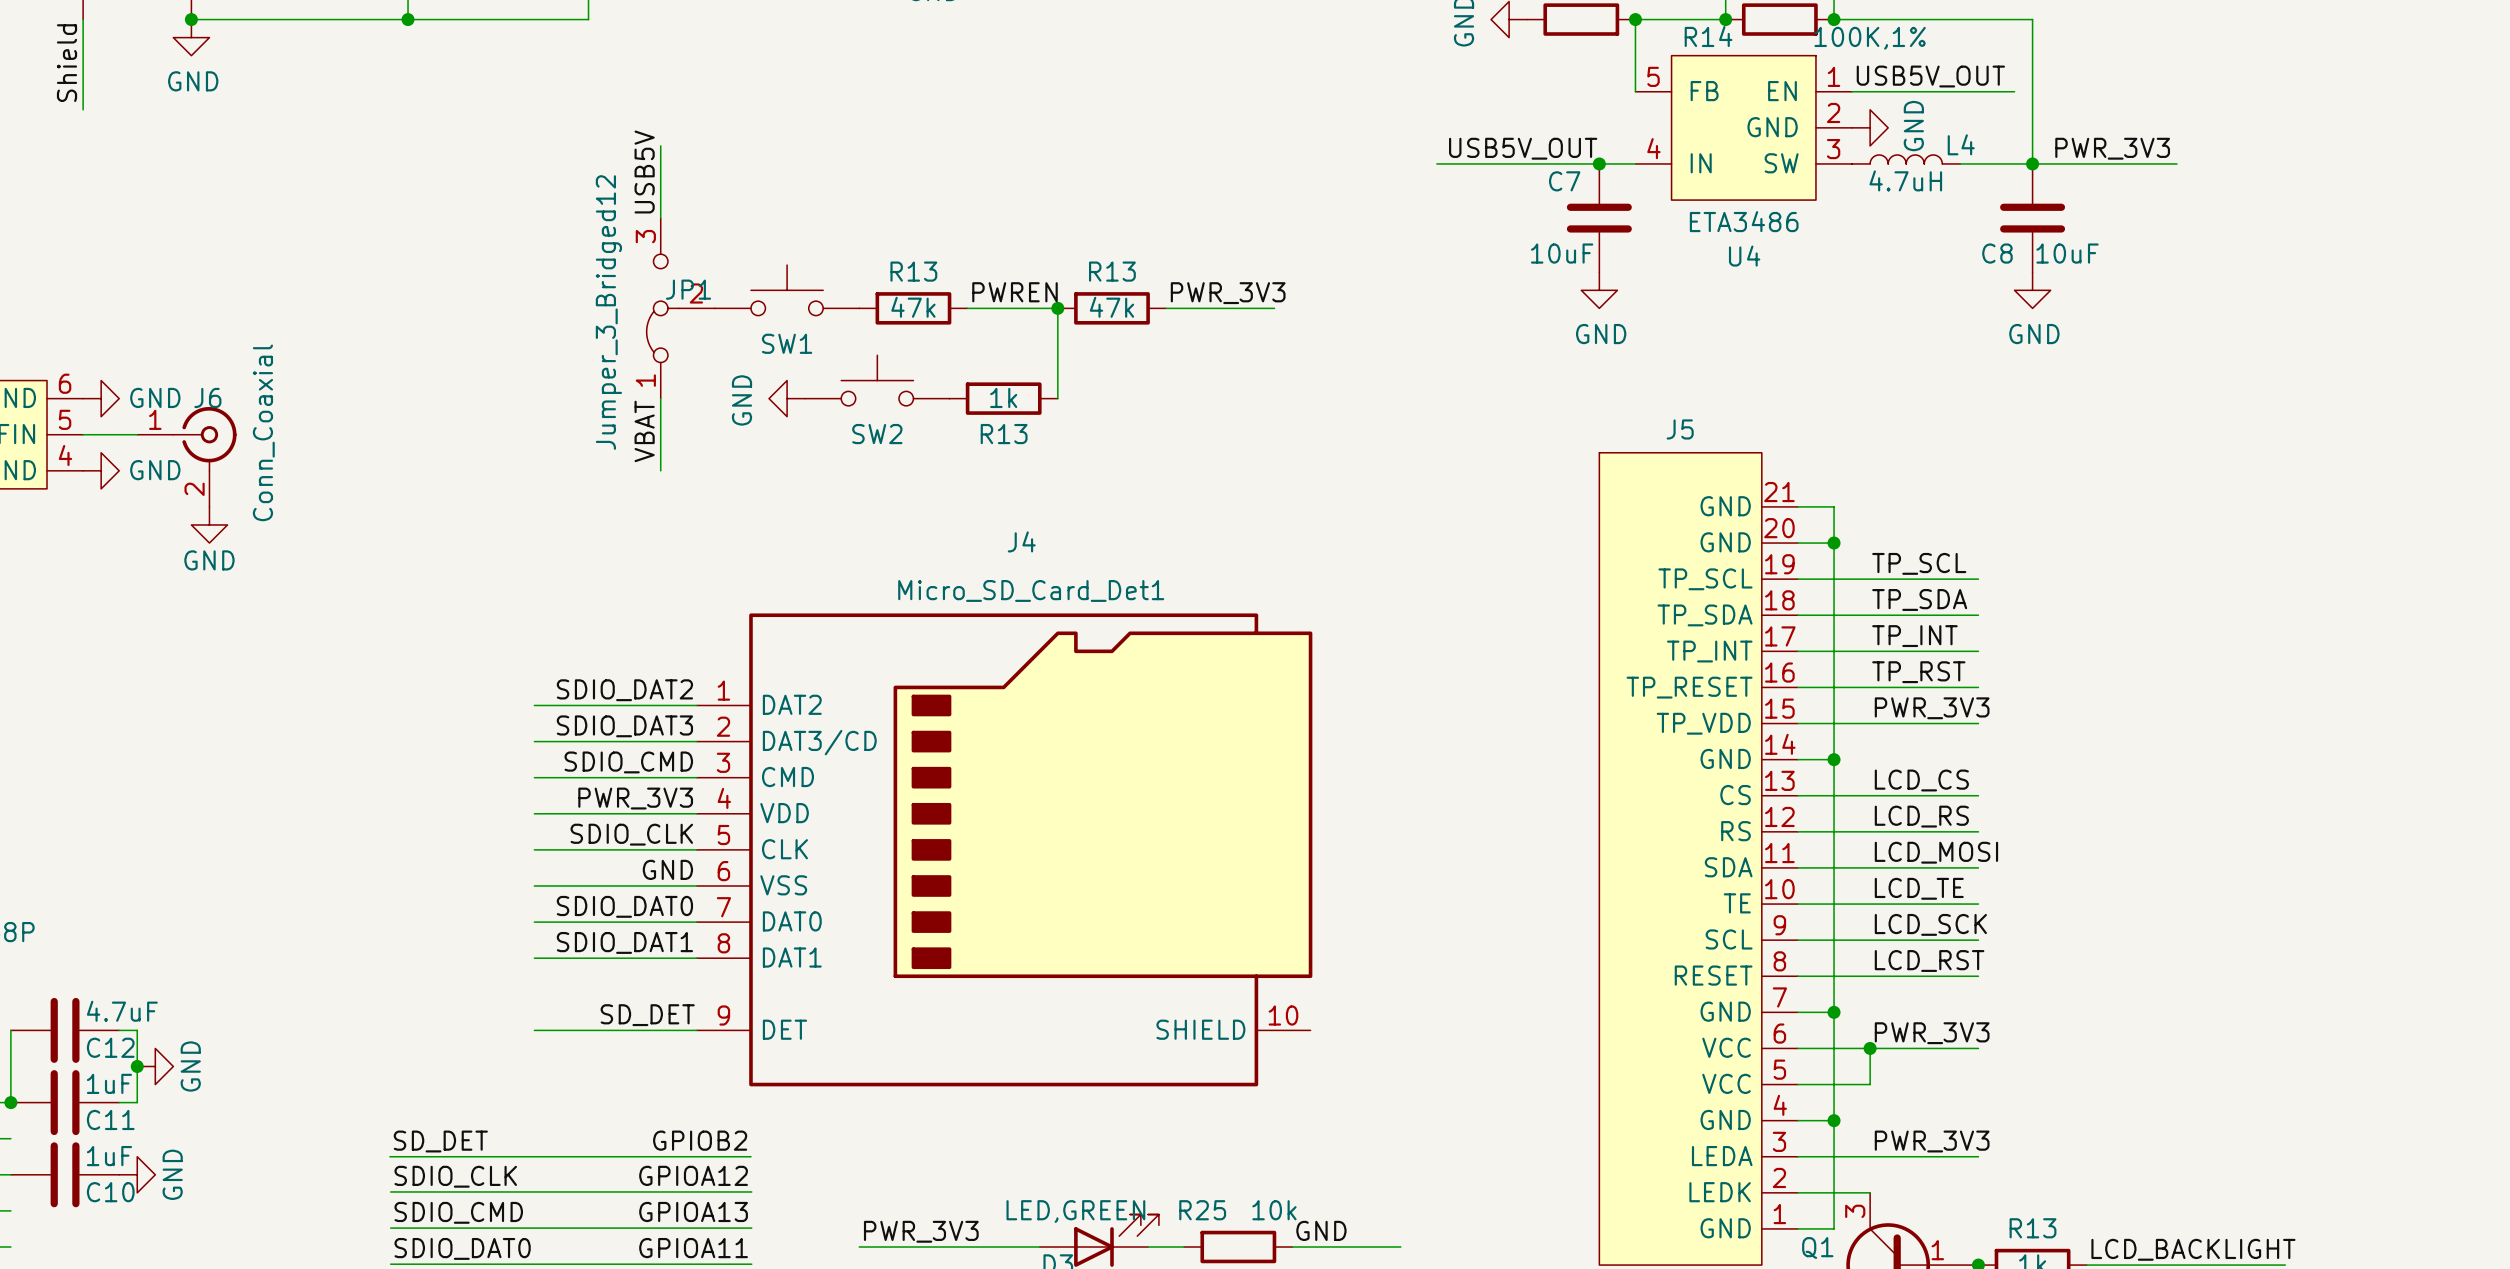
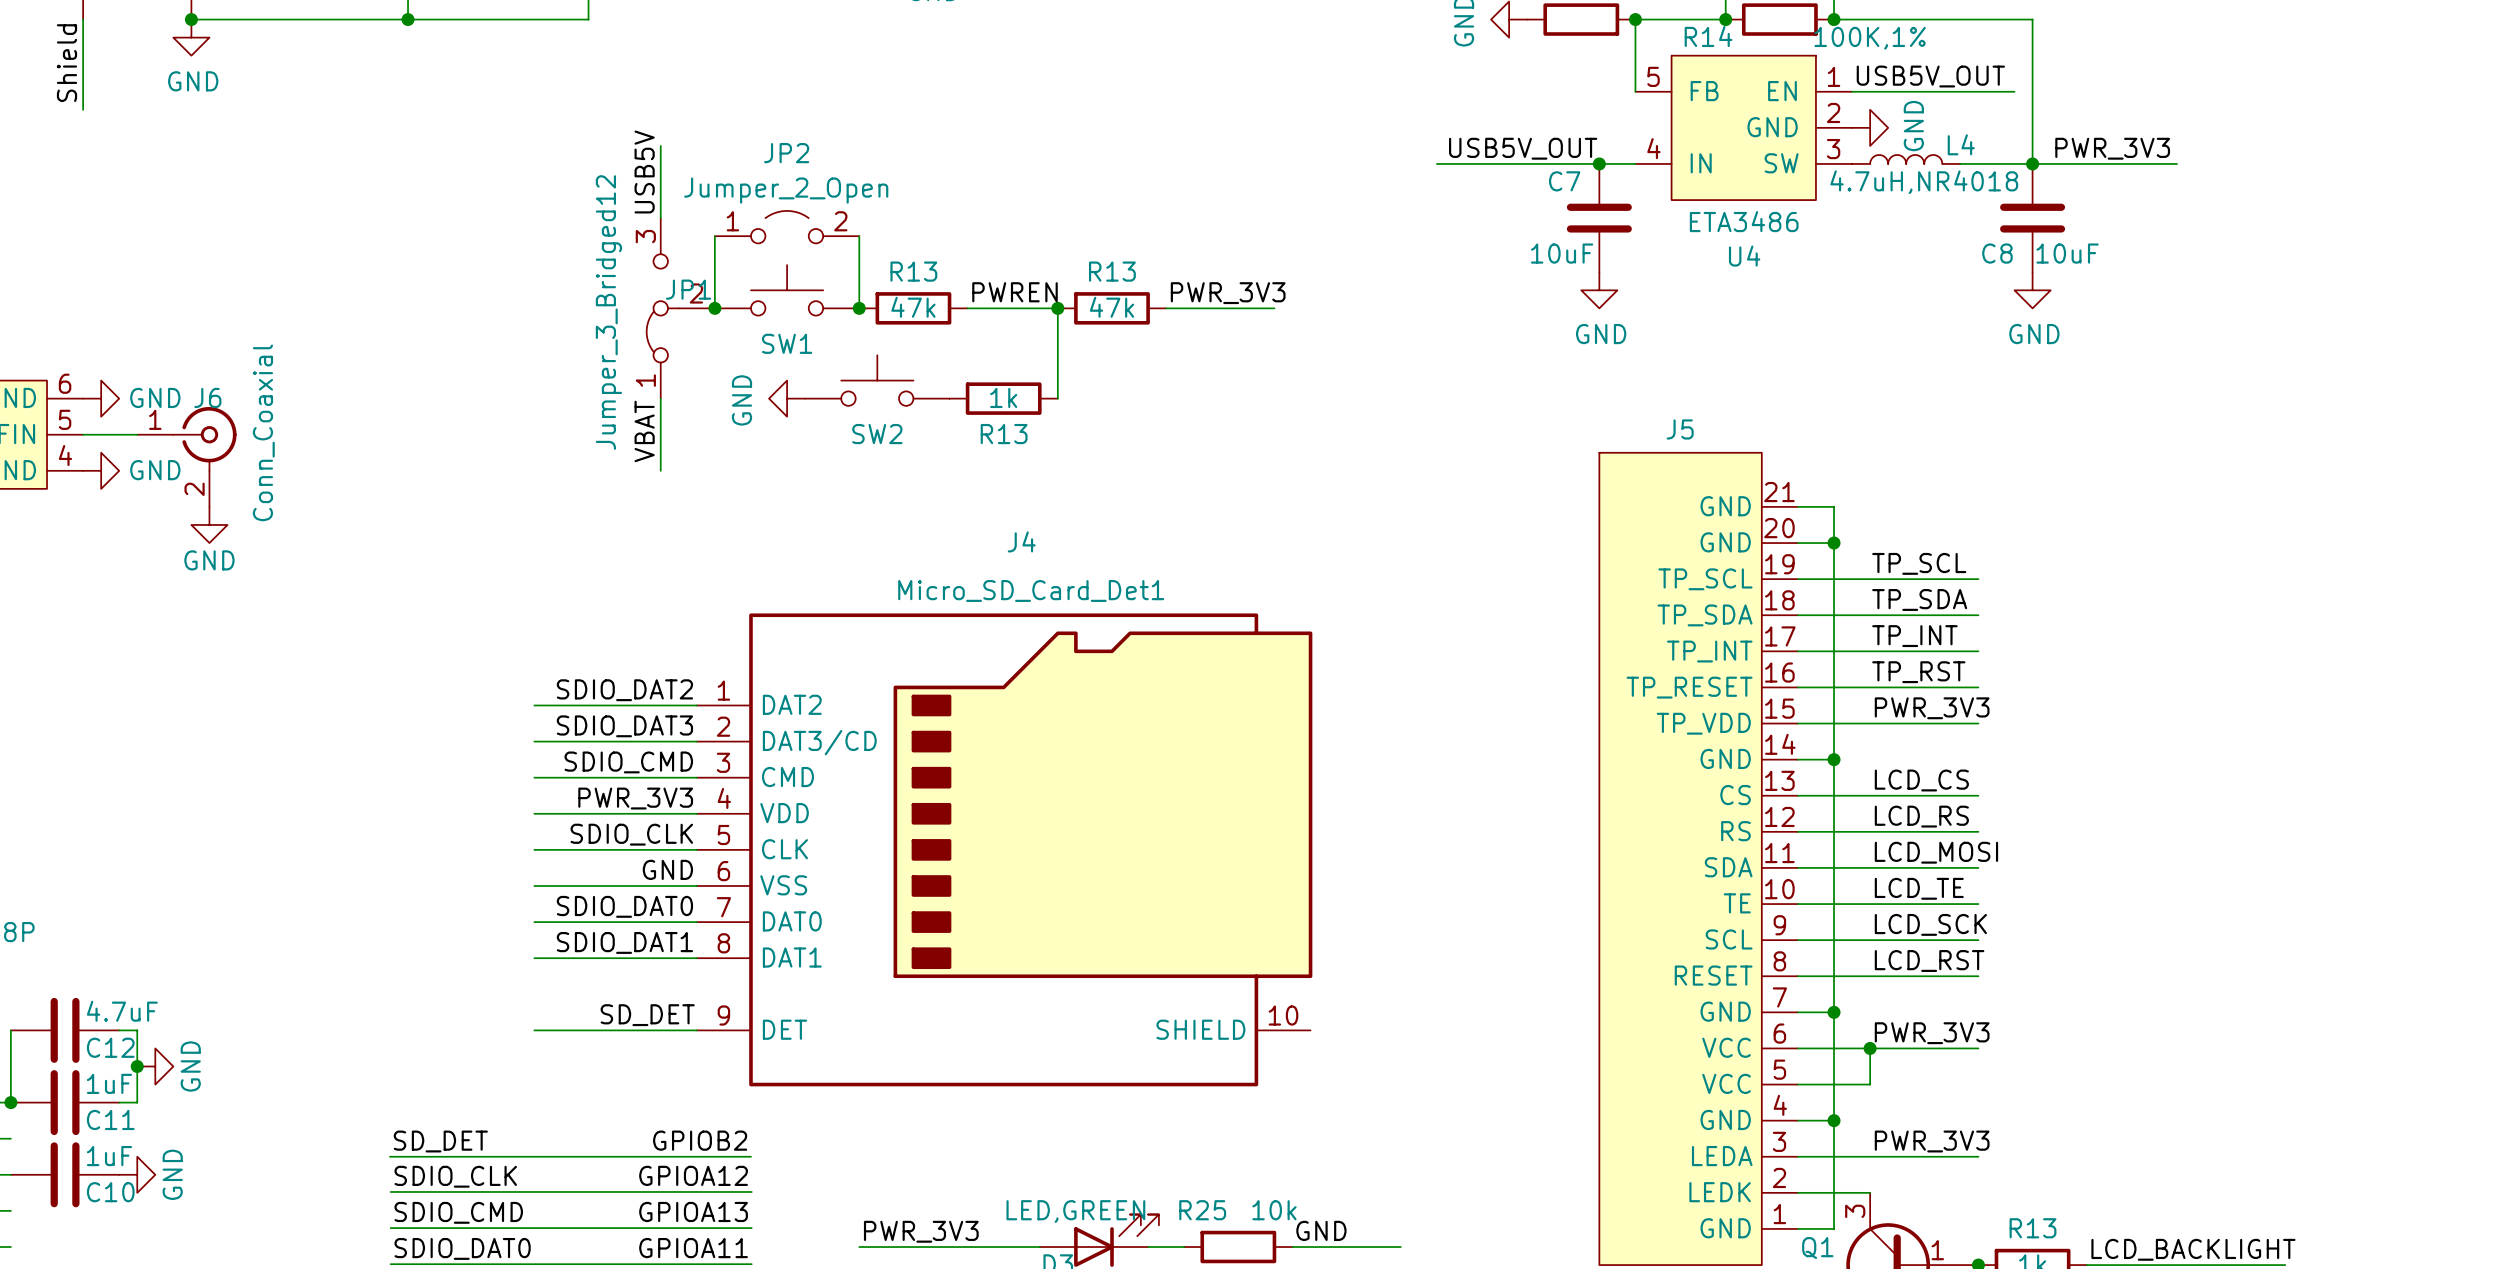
L4 value: 4.7uH (1905, 180) -> 4.7uH,NR4018 (1924, 182)
JP2: none -> Jumper_2_Open (787, 227)
wire: none -> (714, 236) (714, 308)
wire: none -> (859, 236) (859, 308)
junction: none -> (714, 308)
junction: none -> (859, 308)

